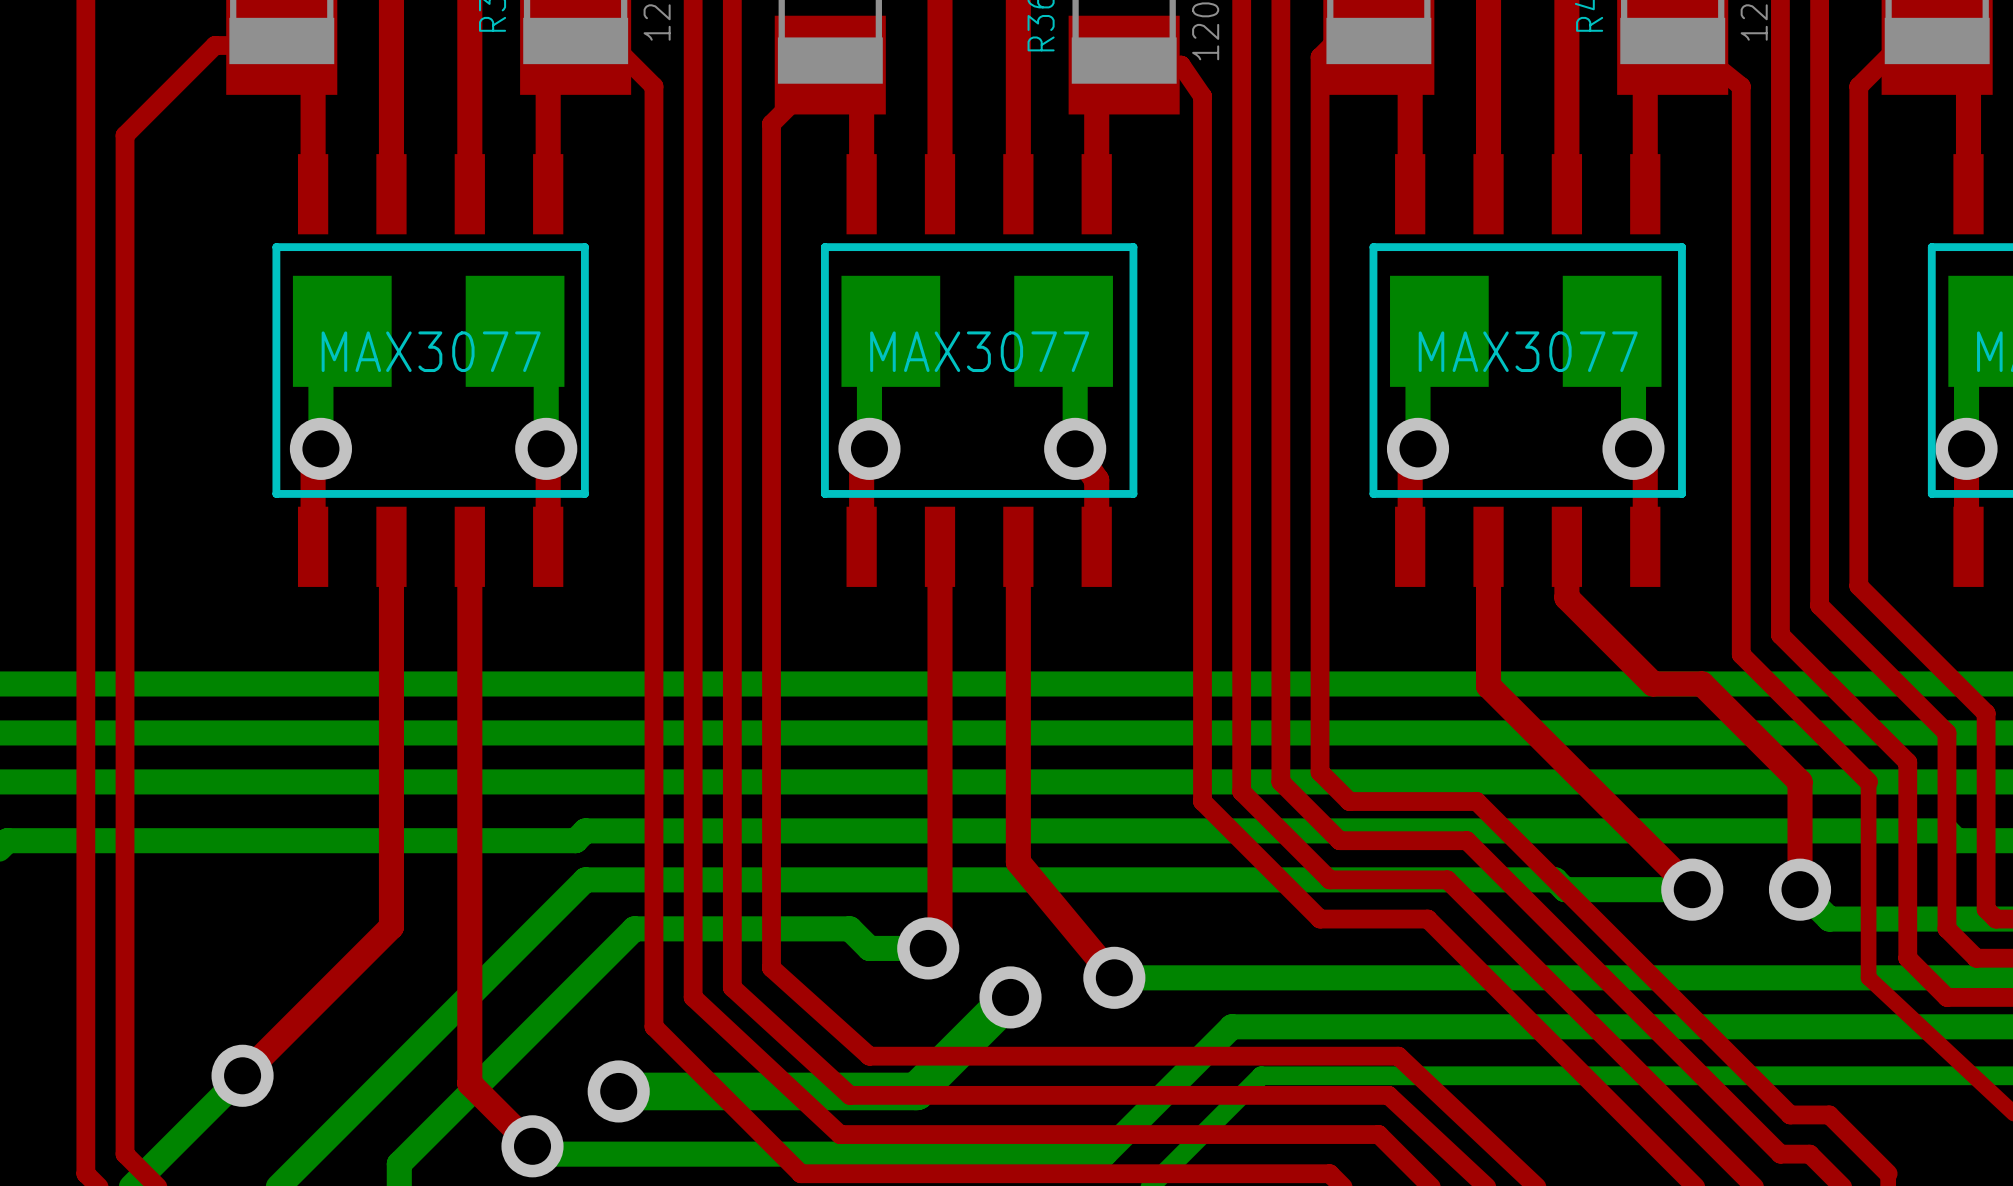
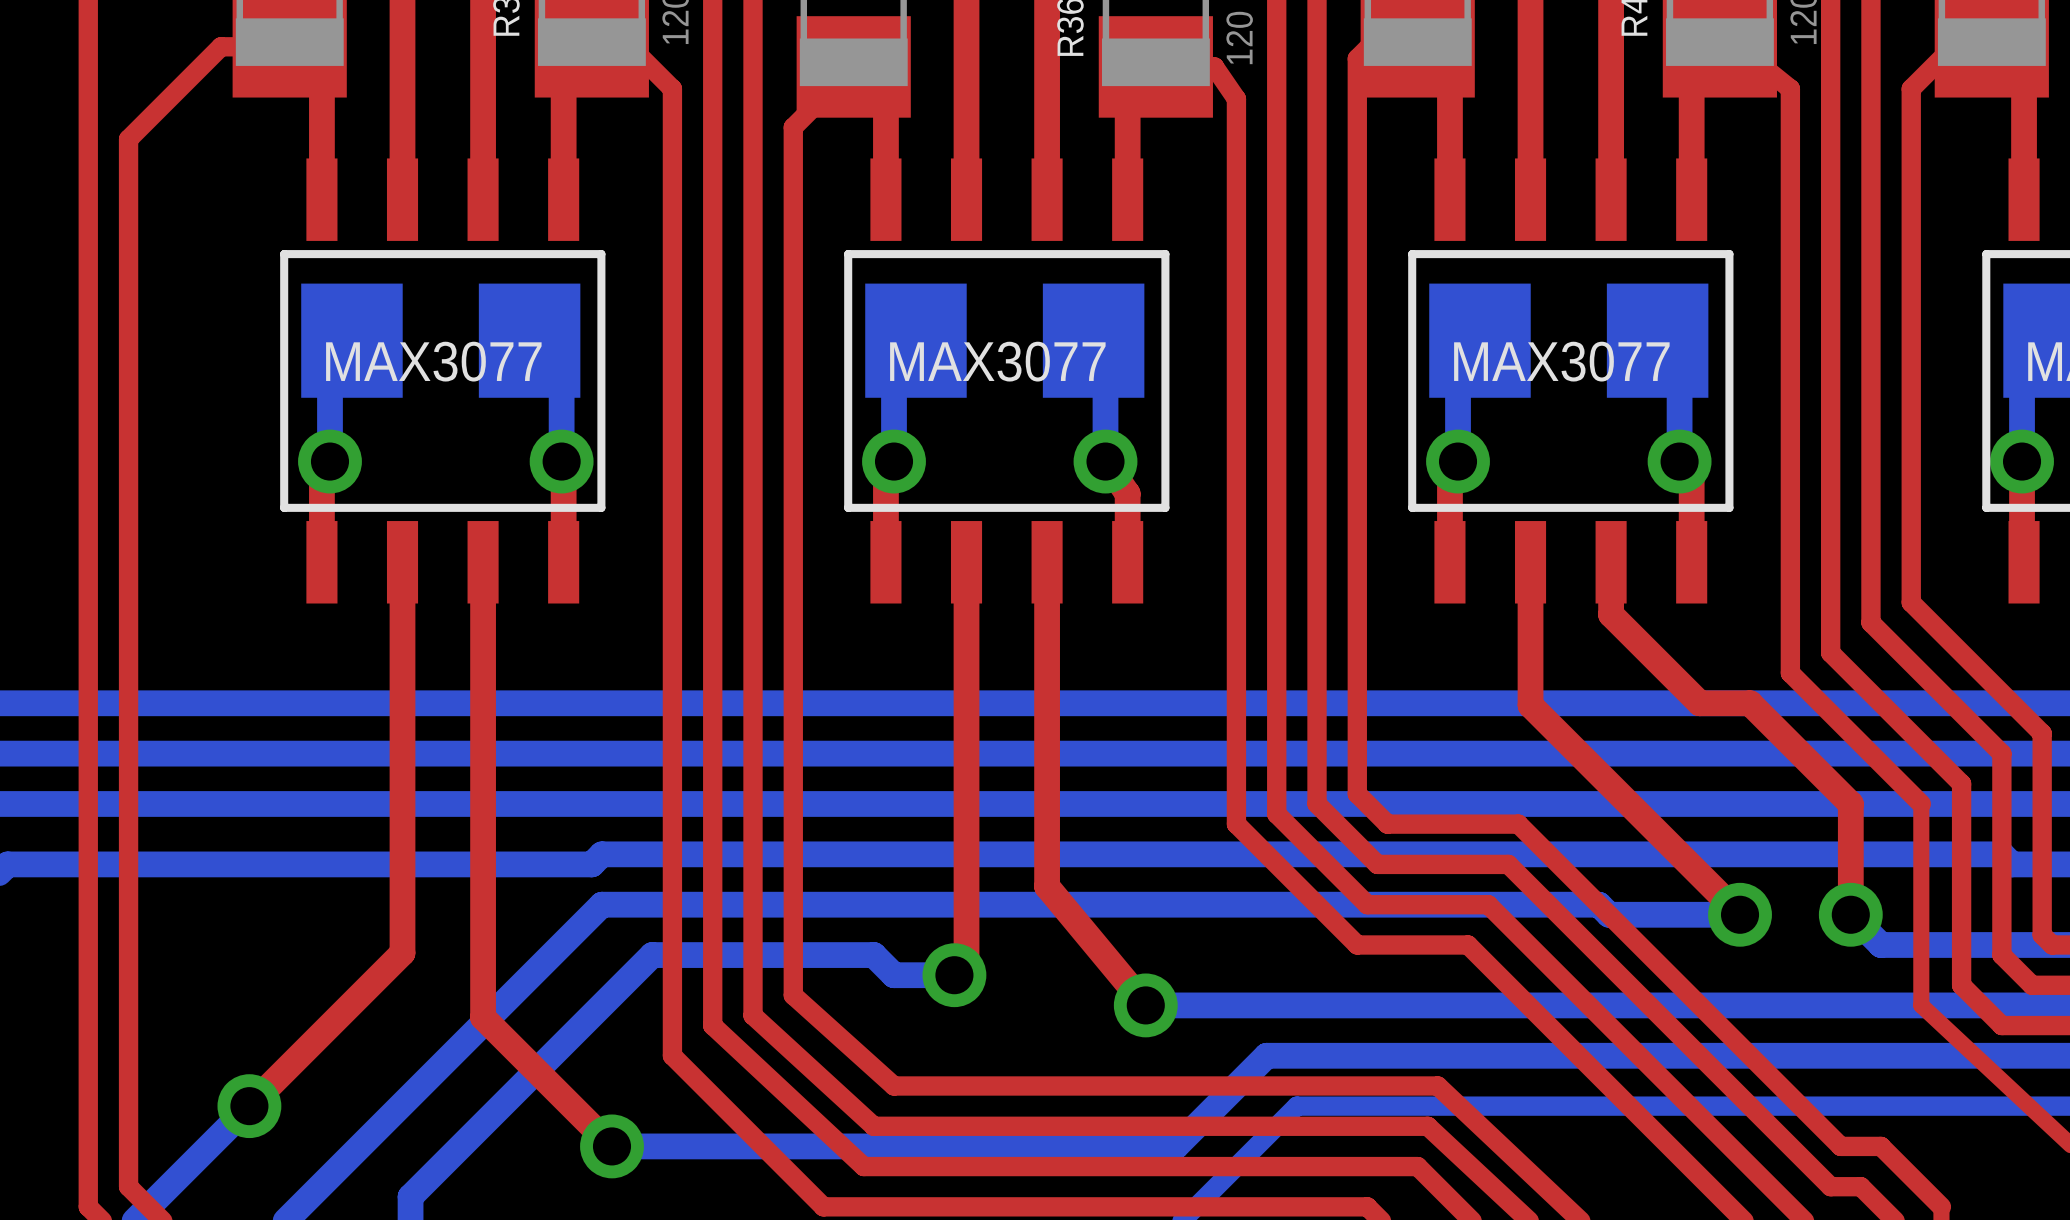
top track: (469, 989) (469, 1083) (532, 1146) -> (483, 1017) (611, 1146)
bottom track: (1010, 997) (916, 1091) (618, 1091) -> none
via: (1010, 997) -> none
via position: (618, 1091) -> (611, 1146)
bottom track: (1143, 1114) (1104, 1154) (540, 1154) (532, 1146) -> (1176, 1146) (611, 1146)
via: (532, 1146) -> none

